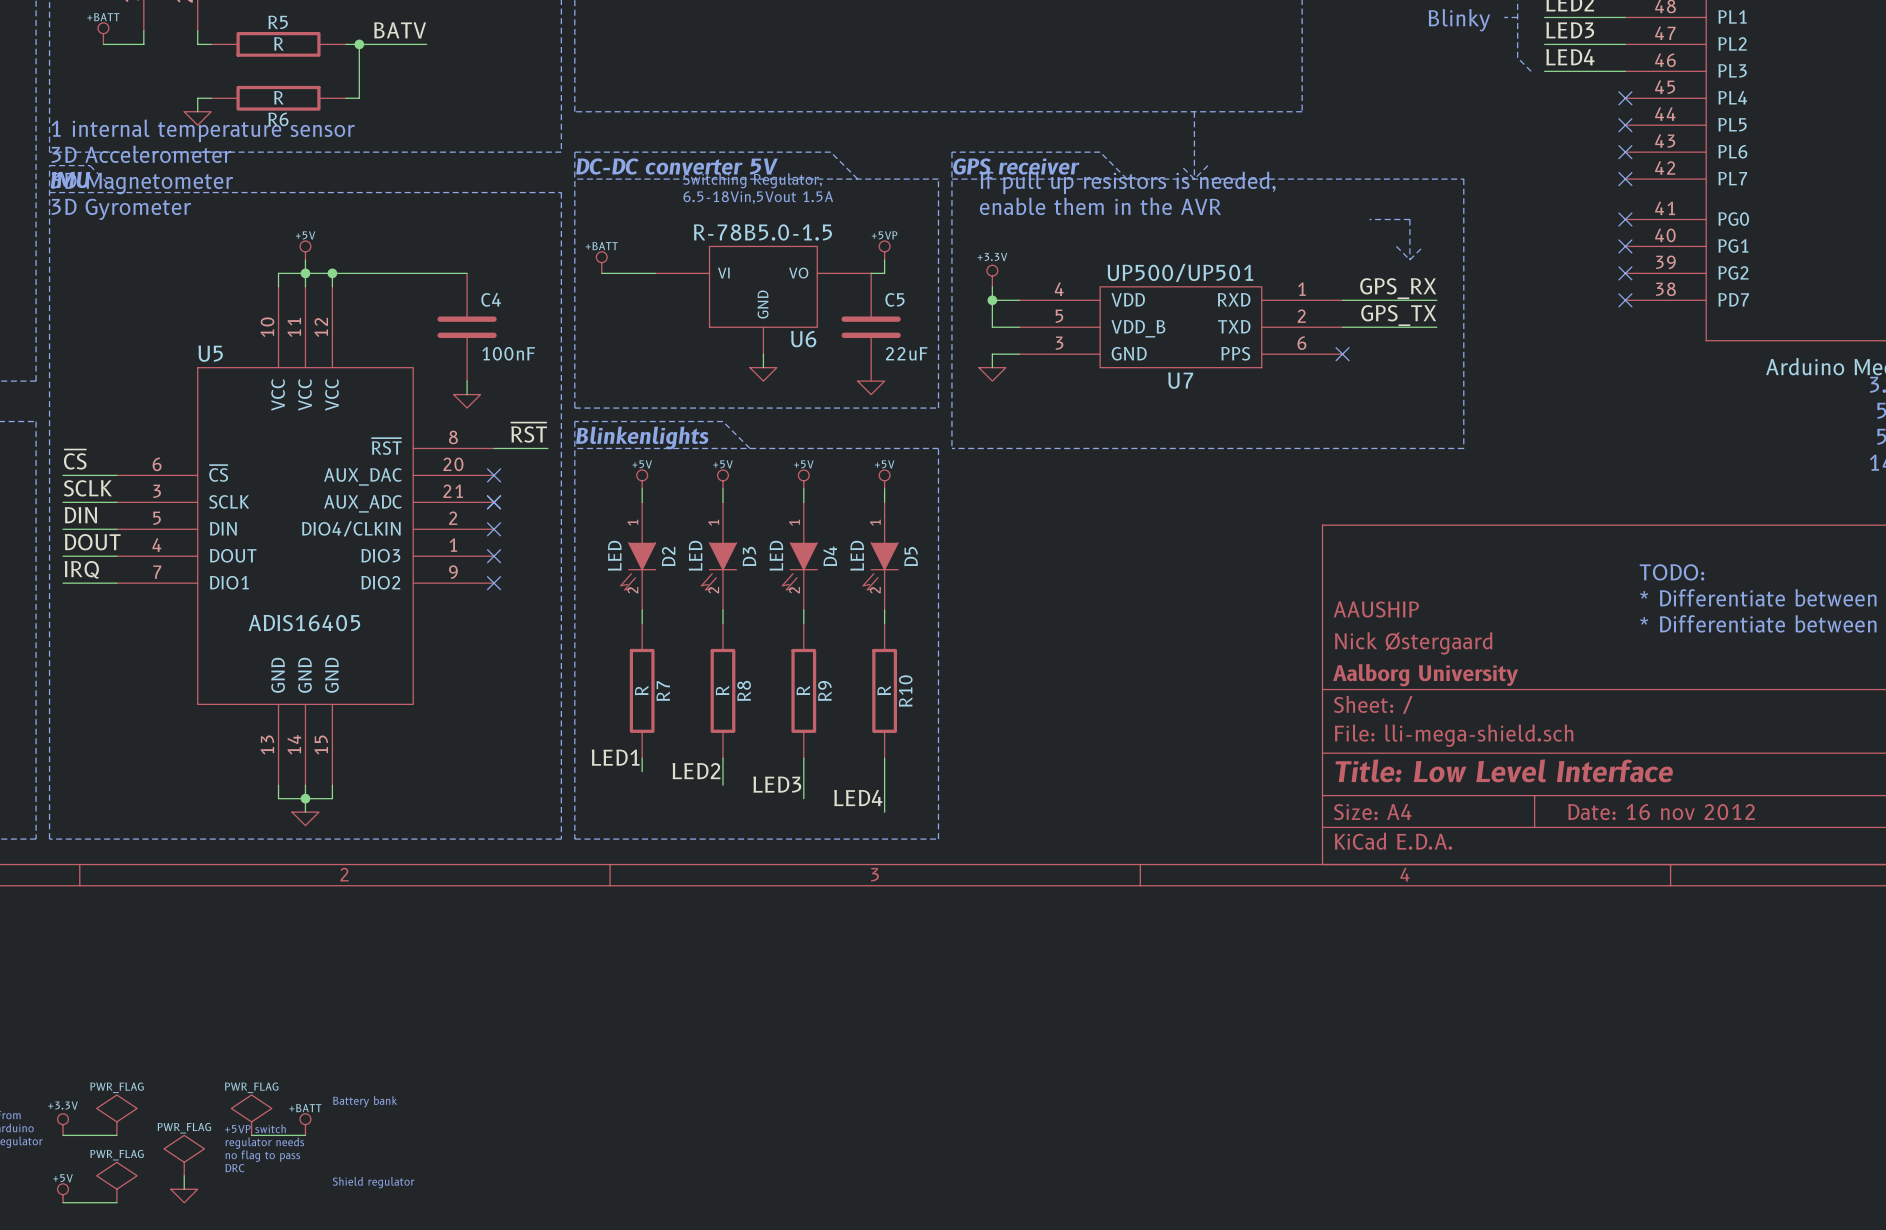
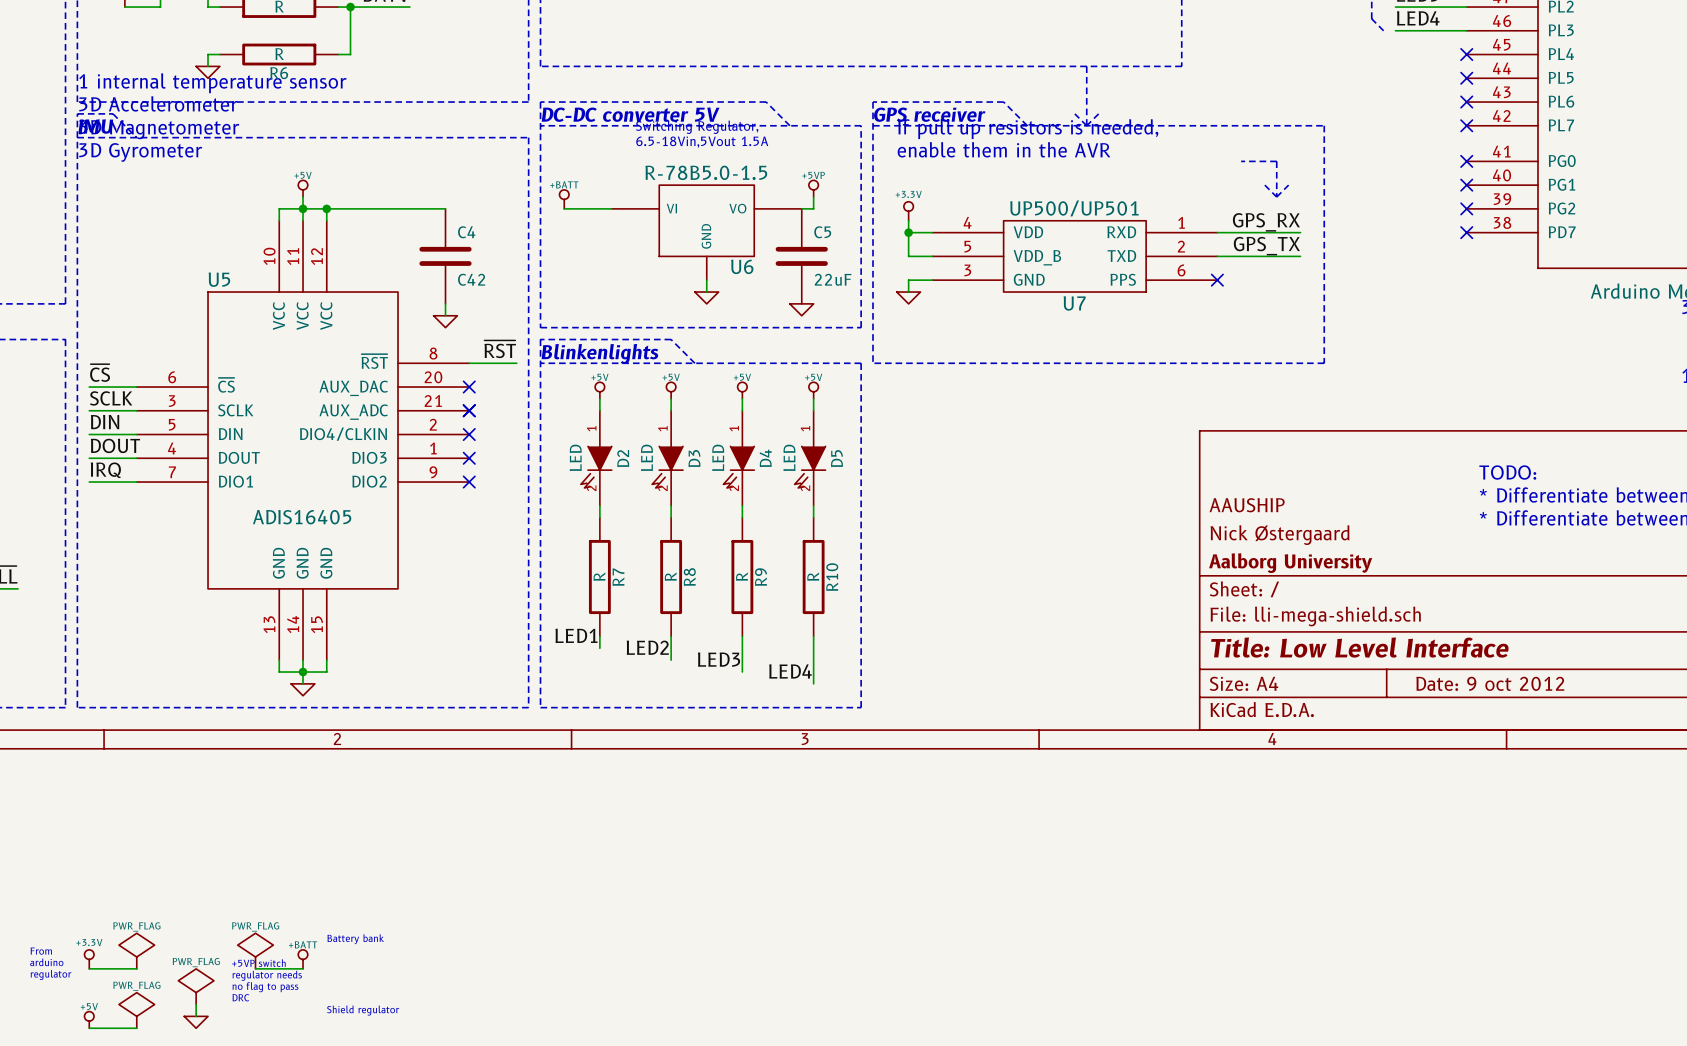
C4 value: 100nF (508, 353) -> C42 (471, 279)
title block: Date: 16 nov 2012 (1661, 812) -> Date: 9 oct 2012 (1490, 683)

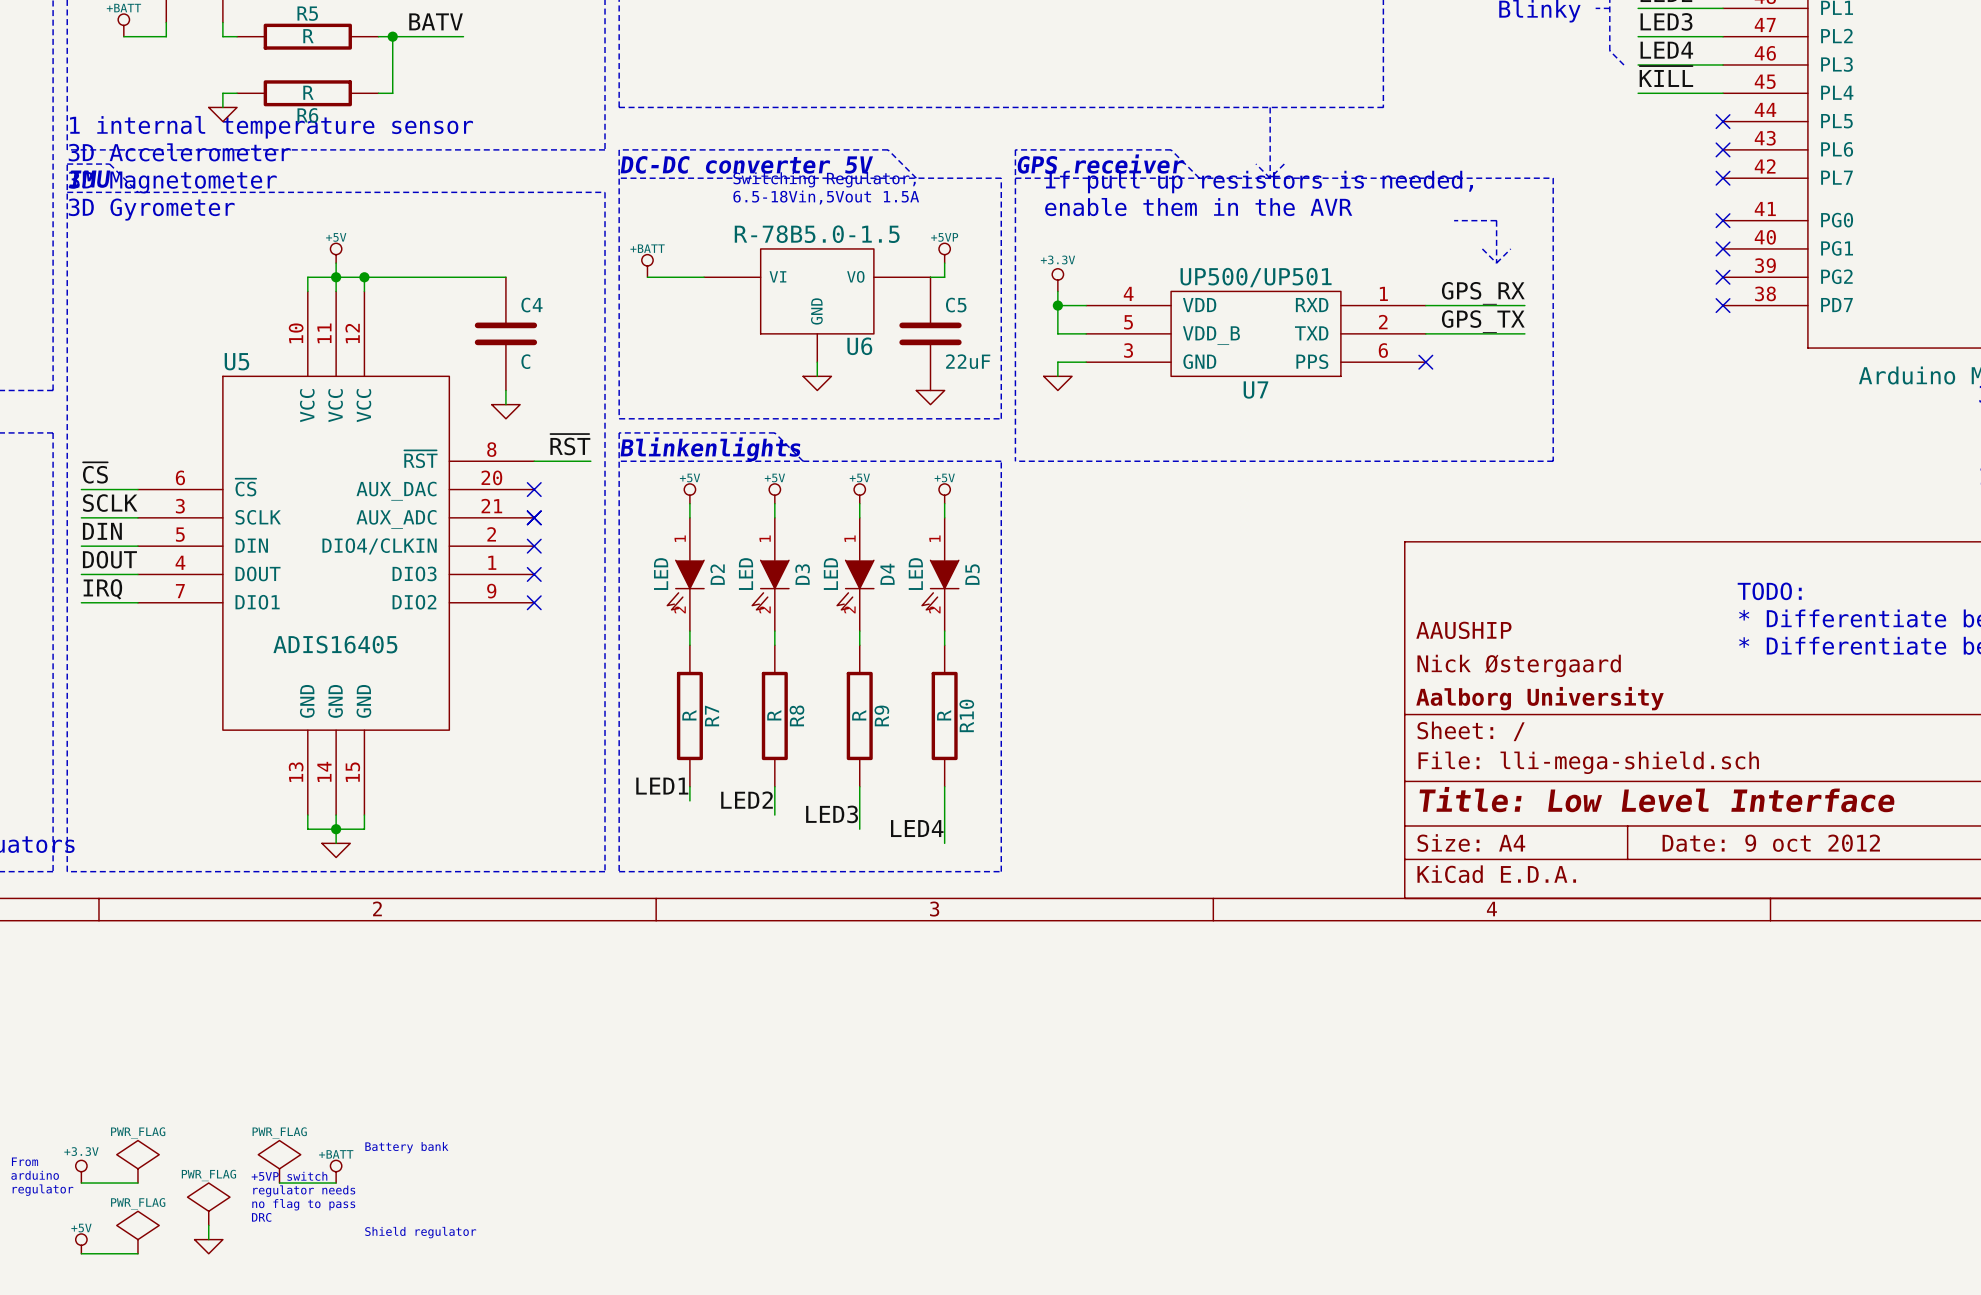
label: none -> ~{KILL} (1666, 76)
wire: none -> (1638, 93) (1723, 93)
no-connect mark: (1466, 54) -> none
C4 value: C42 (471, 279) -> C (525, 361)

